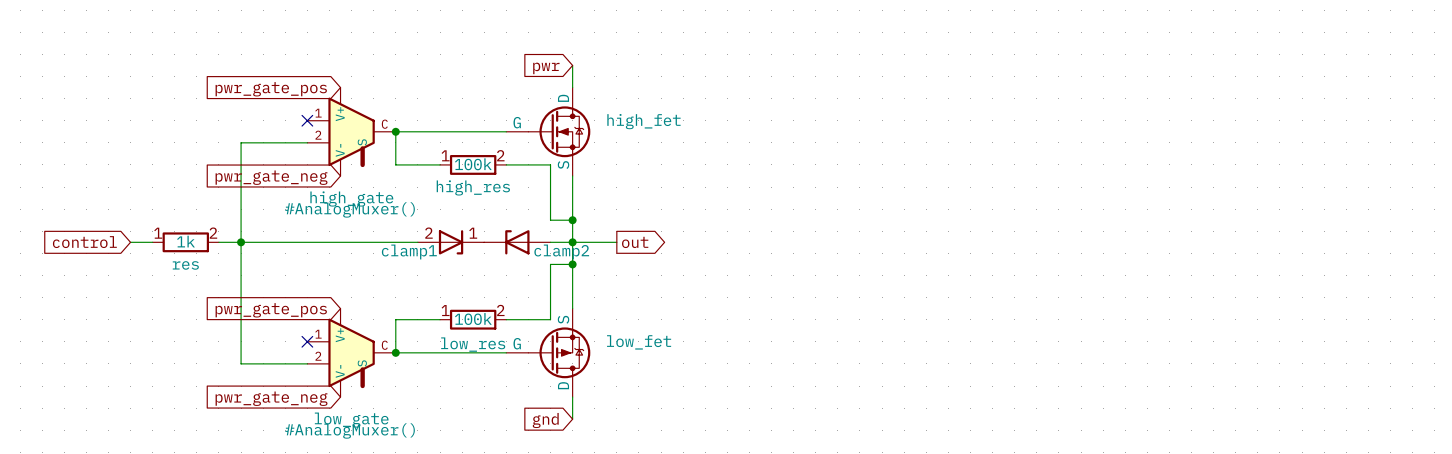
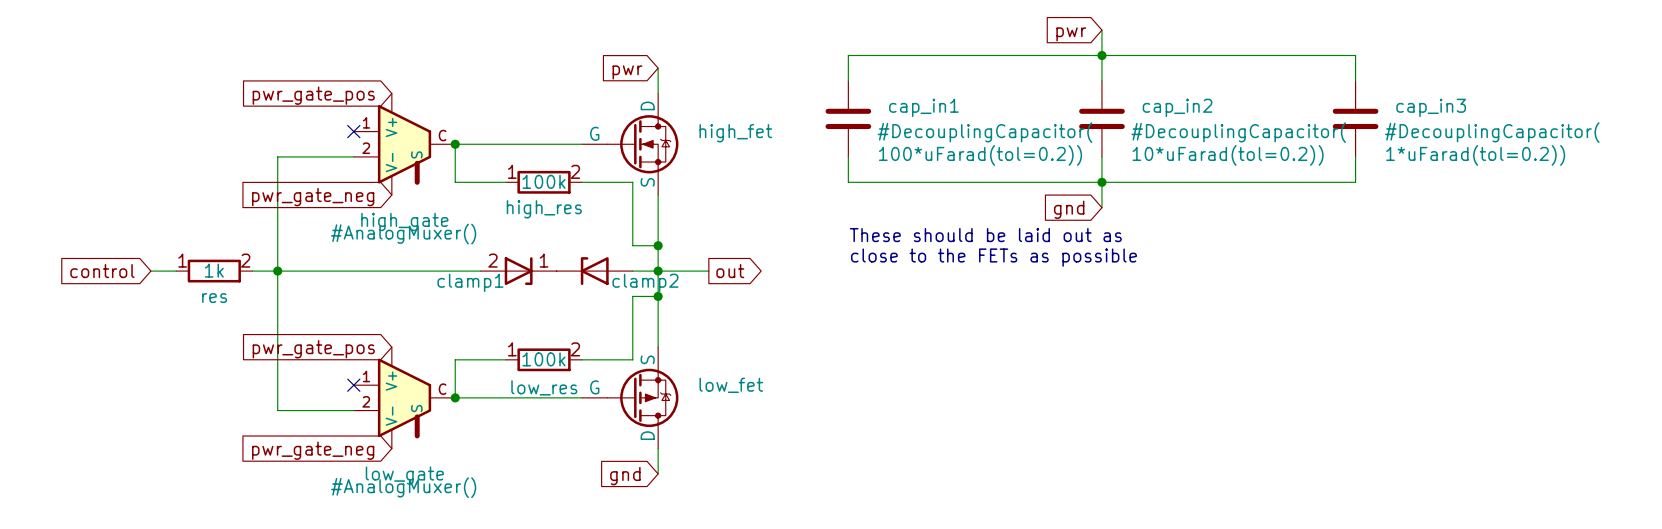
wire: none -> (1101, 30) (1101, 80)
global label: none -> pwr (1071, 34)
junction: none -> (1101, 55)
wire: none -> (848, 80) (848, 55) (1355, 55) (1355, 80)
cap_in1: none -> #DecouplingCapacitor( (848, 118)
cap_in2: none -> #DecouplingCapacitor( (1101, 118)
cap_in3: none -> #DecouplingCapacitor( (1355, 118)
wire: none -> (848, 156) (848, 182) (1355, 182) (1355, 156)
wire: none -> (1101, 156) (1101, 207)
junction: none -> (1101, 182)
global label: none -> gnd (1069, 209)
text: none -> These should be laid out as (985, 235)
text: none -> close to the FETs as possible (993, 257)

